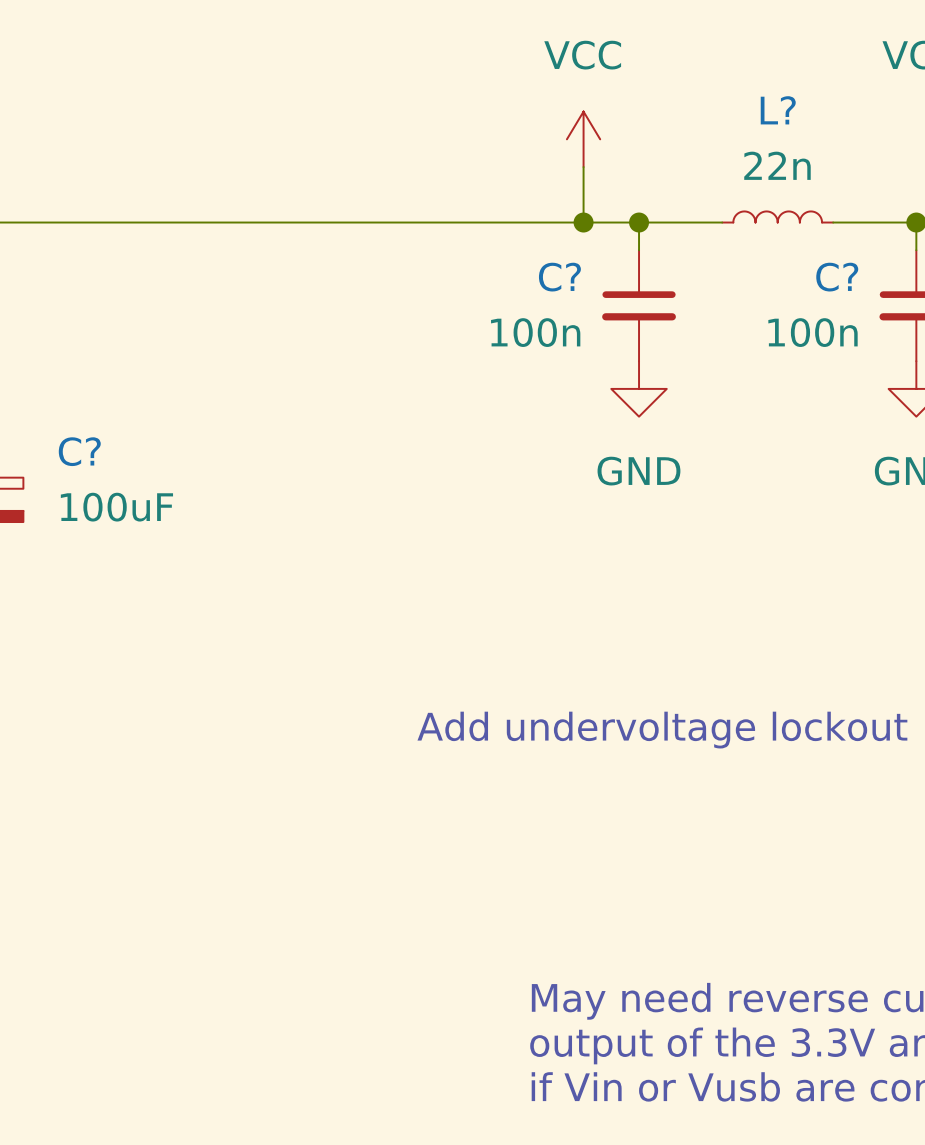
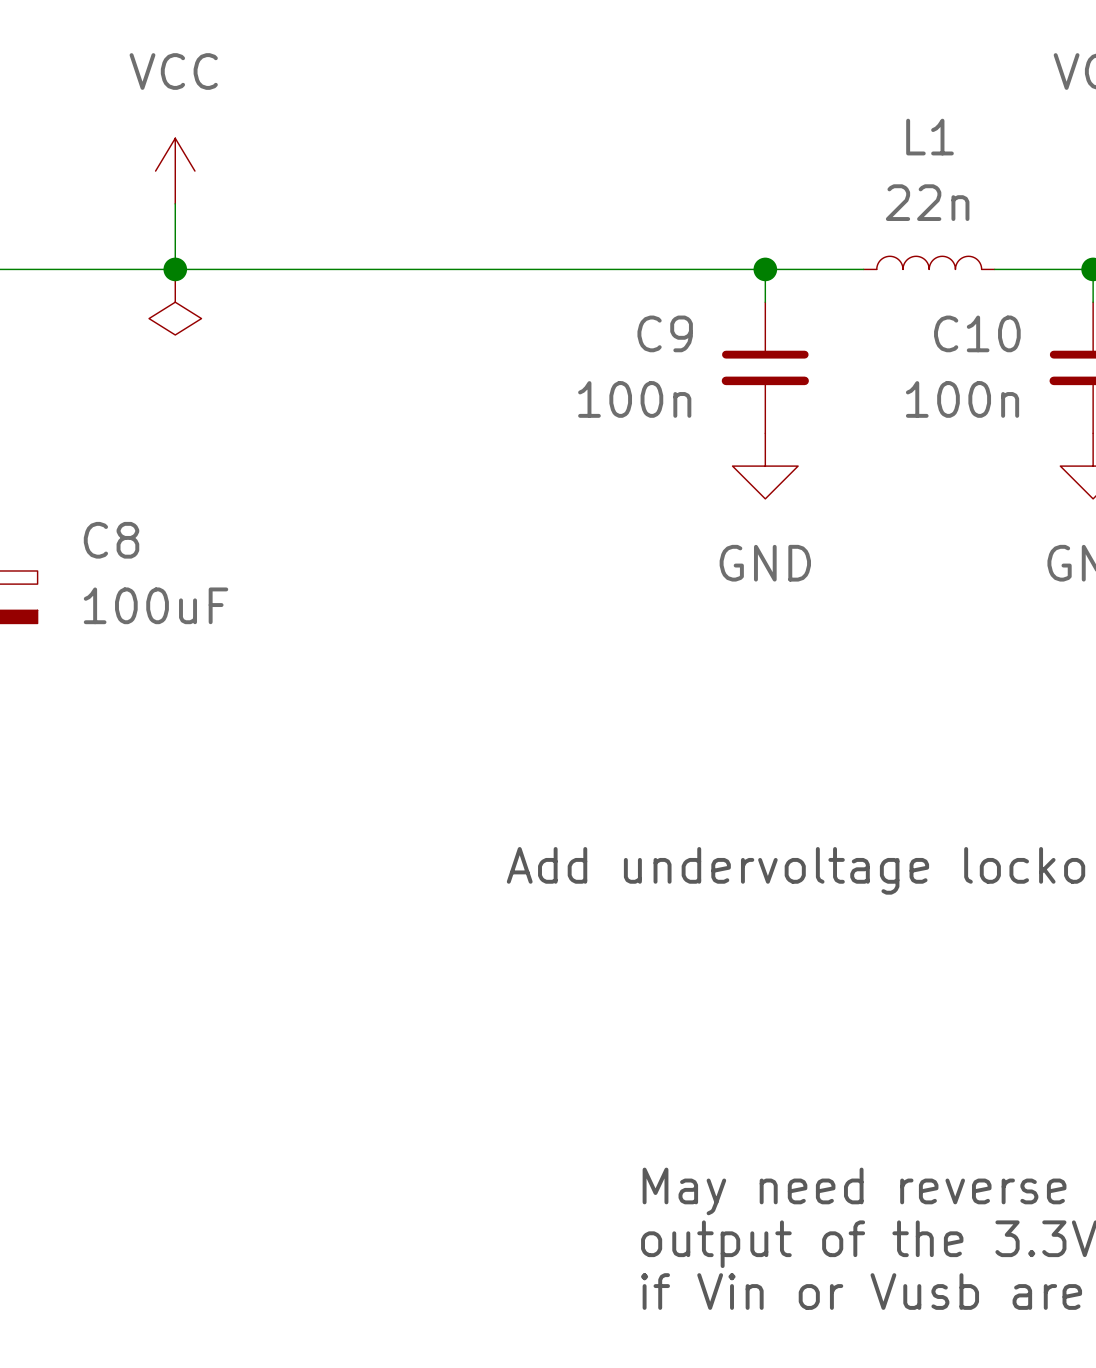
L? name: L? (778, 110) -> L1 (930, 137)
power symbol position: VCC (583, 139) -> VCC (175, 171)
wire: (583, 167) (583, 222) -> (175, 203) (175, 269)
junction: none -> (175, 269)
junction: (583, 222) -> none
power symbol: none -> (175, 302)
C? name: C? (559, 277) -> C9 (665, 333)
C? name: C? (837, 277) -> C10 (977, 333)
C? name: C? (79, 451) -> C8 (111, 540)

